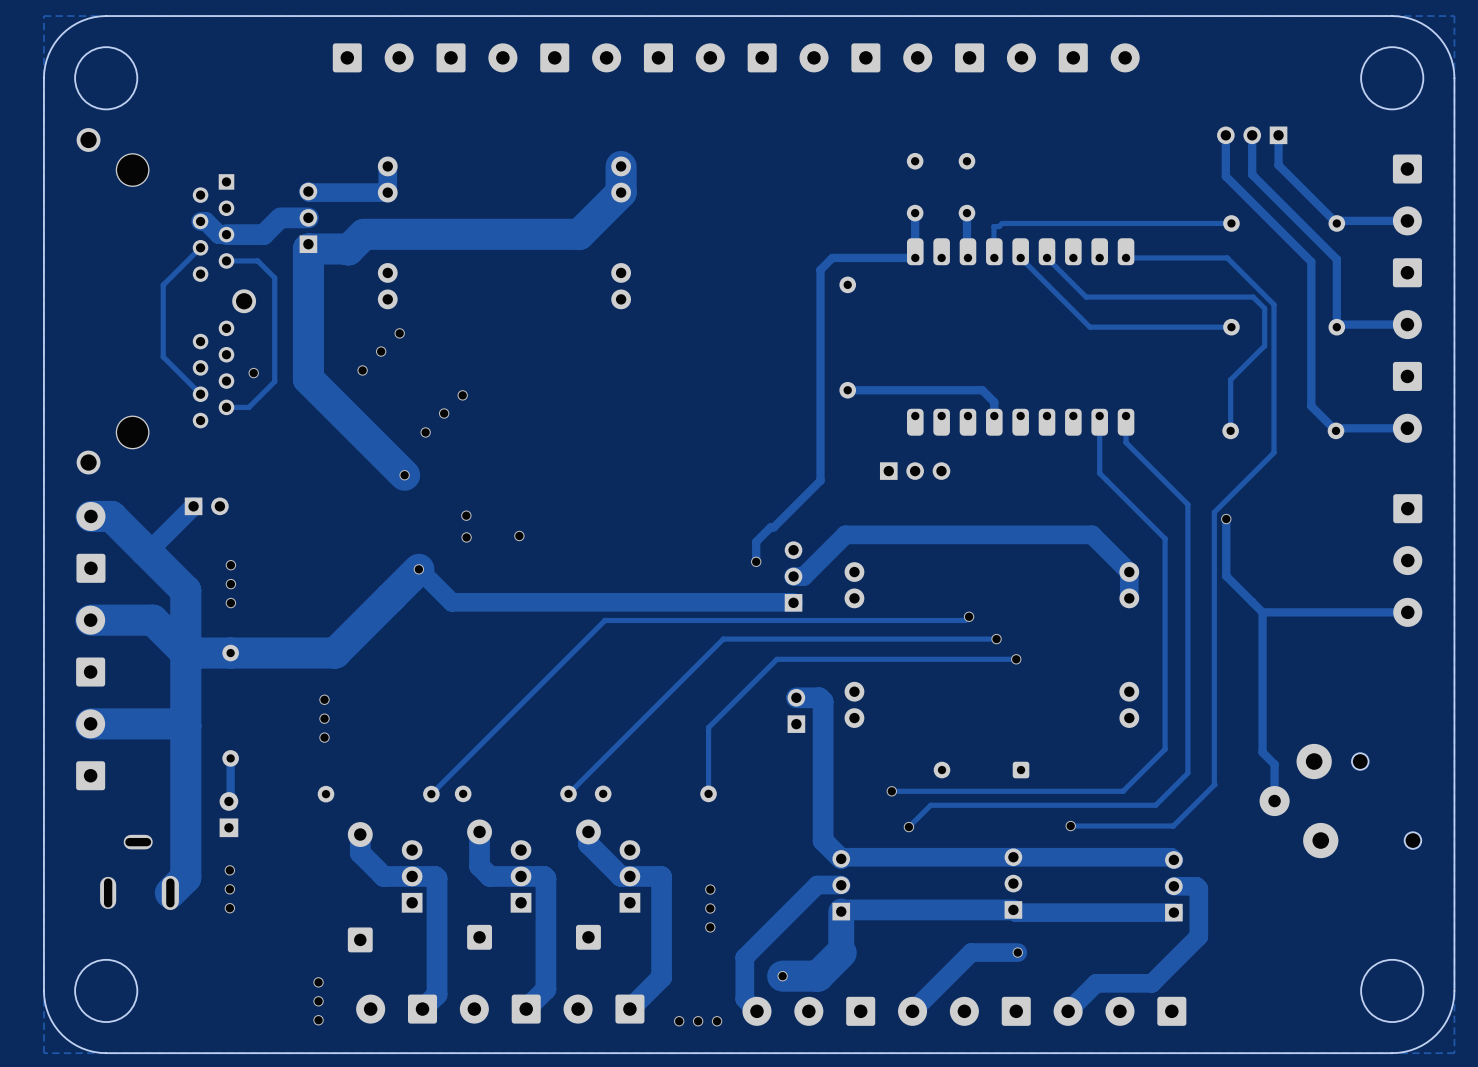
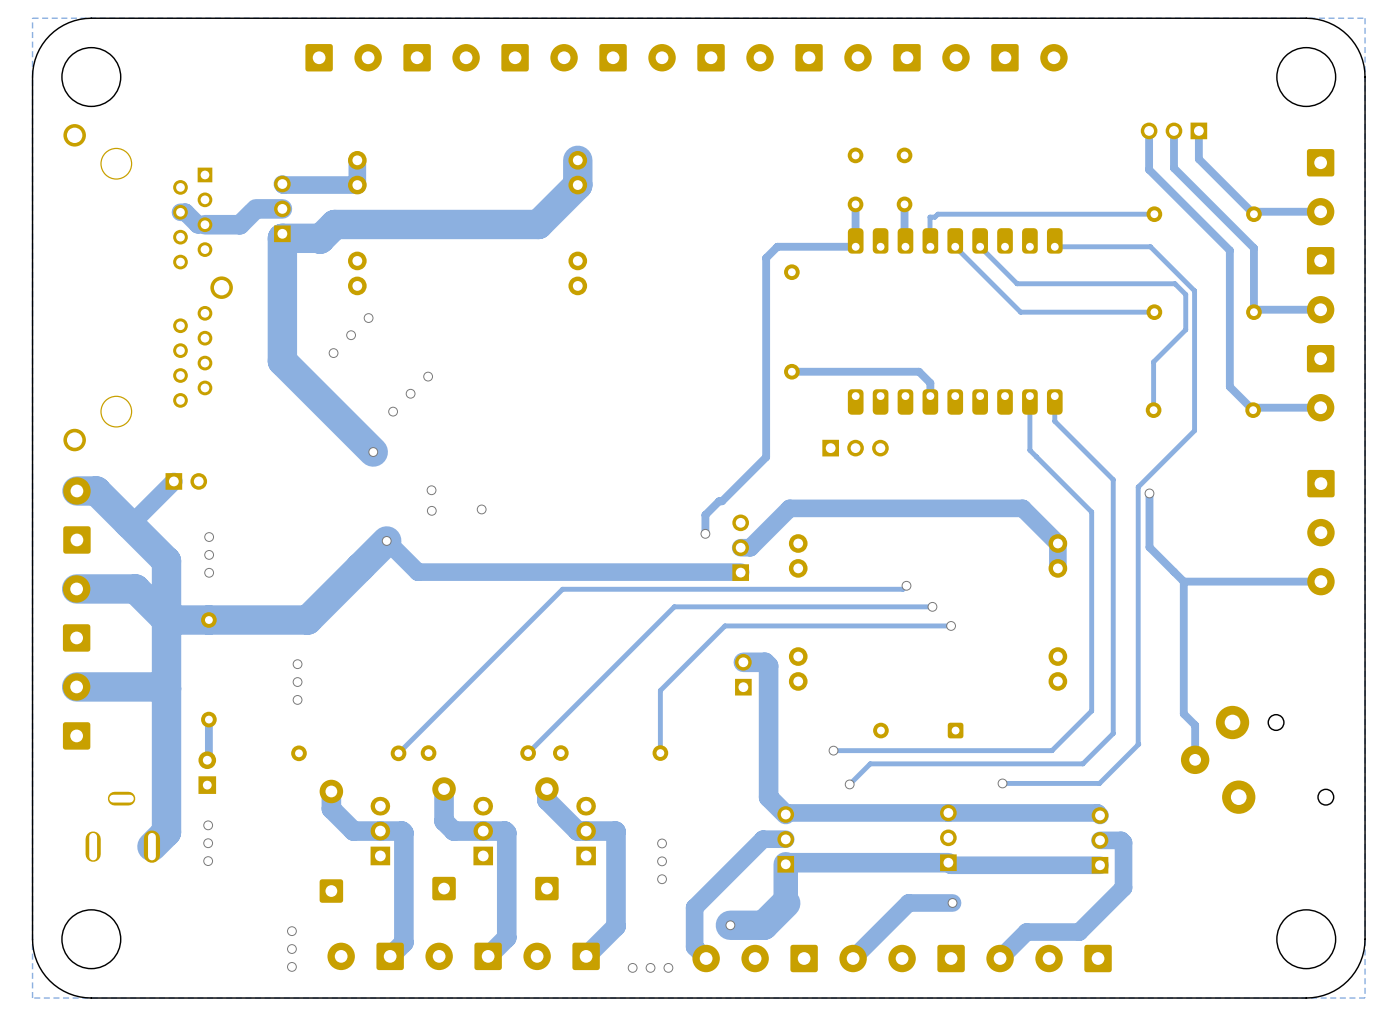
track: (200, 247) (163, 285) (163, 356) (200, 394) -> none
track: (226, 260) (257, 260) (274, 277) (274, 381) (248, 407) (226, 407) -> none
via: (253, 373) -> none

